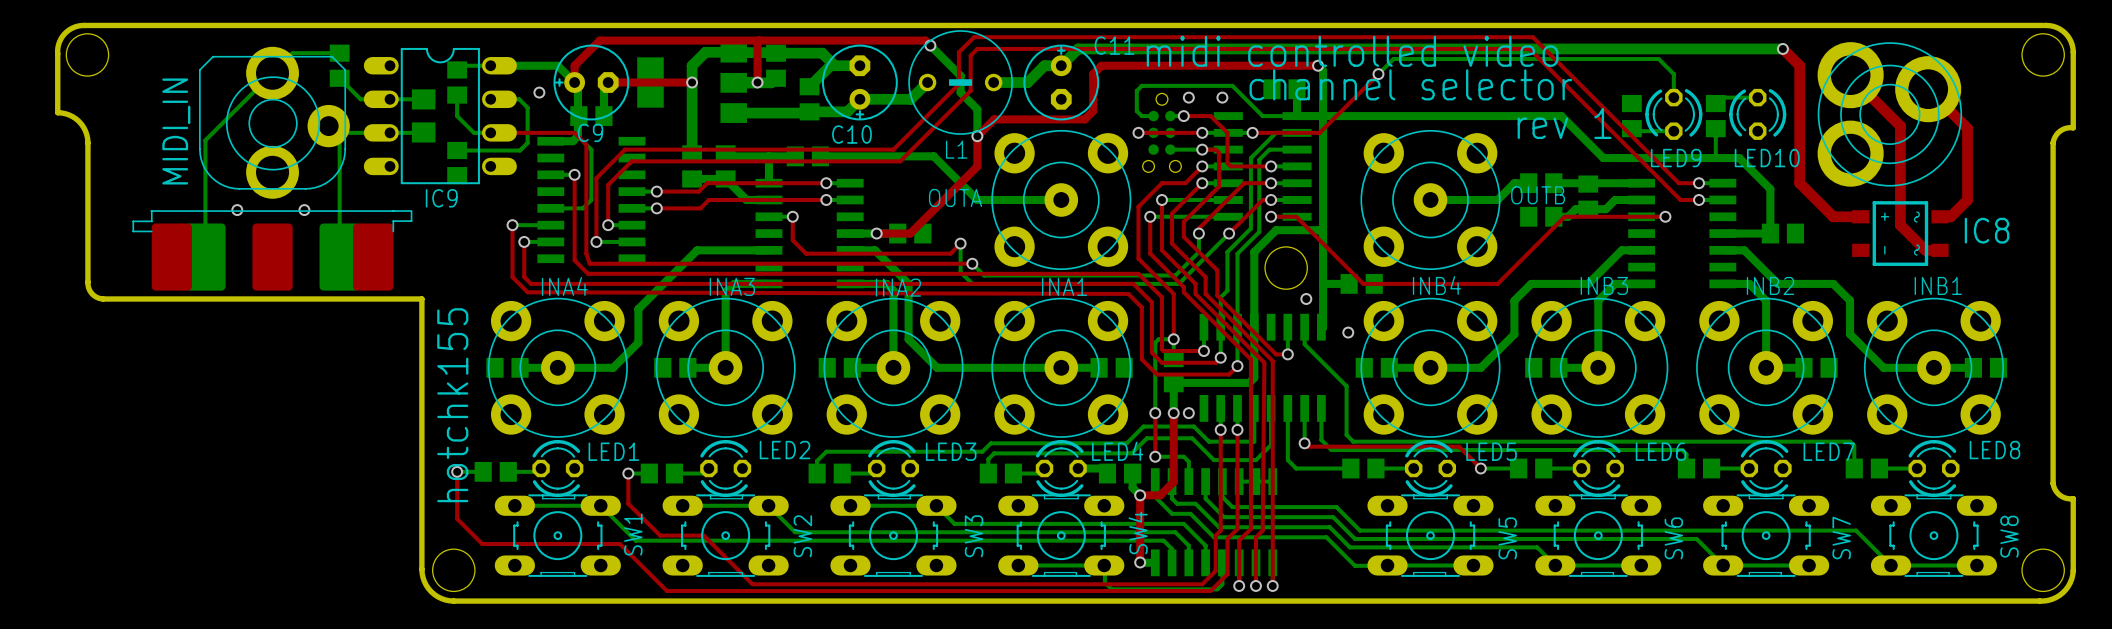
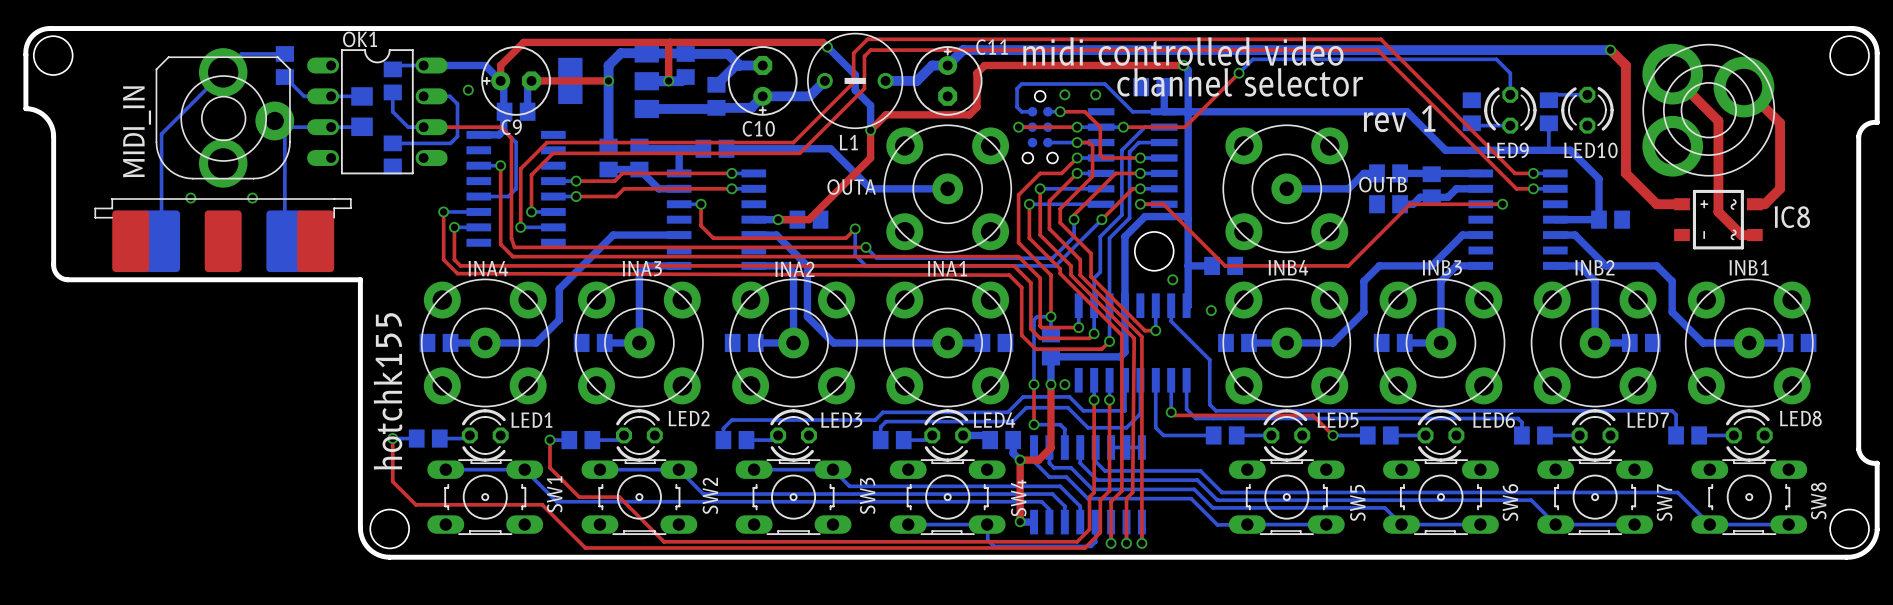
IC9 name: IC9 (441, 198) -> OK1 (360, 39)

